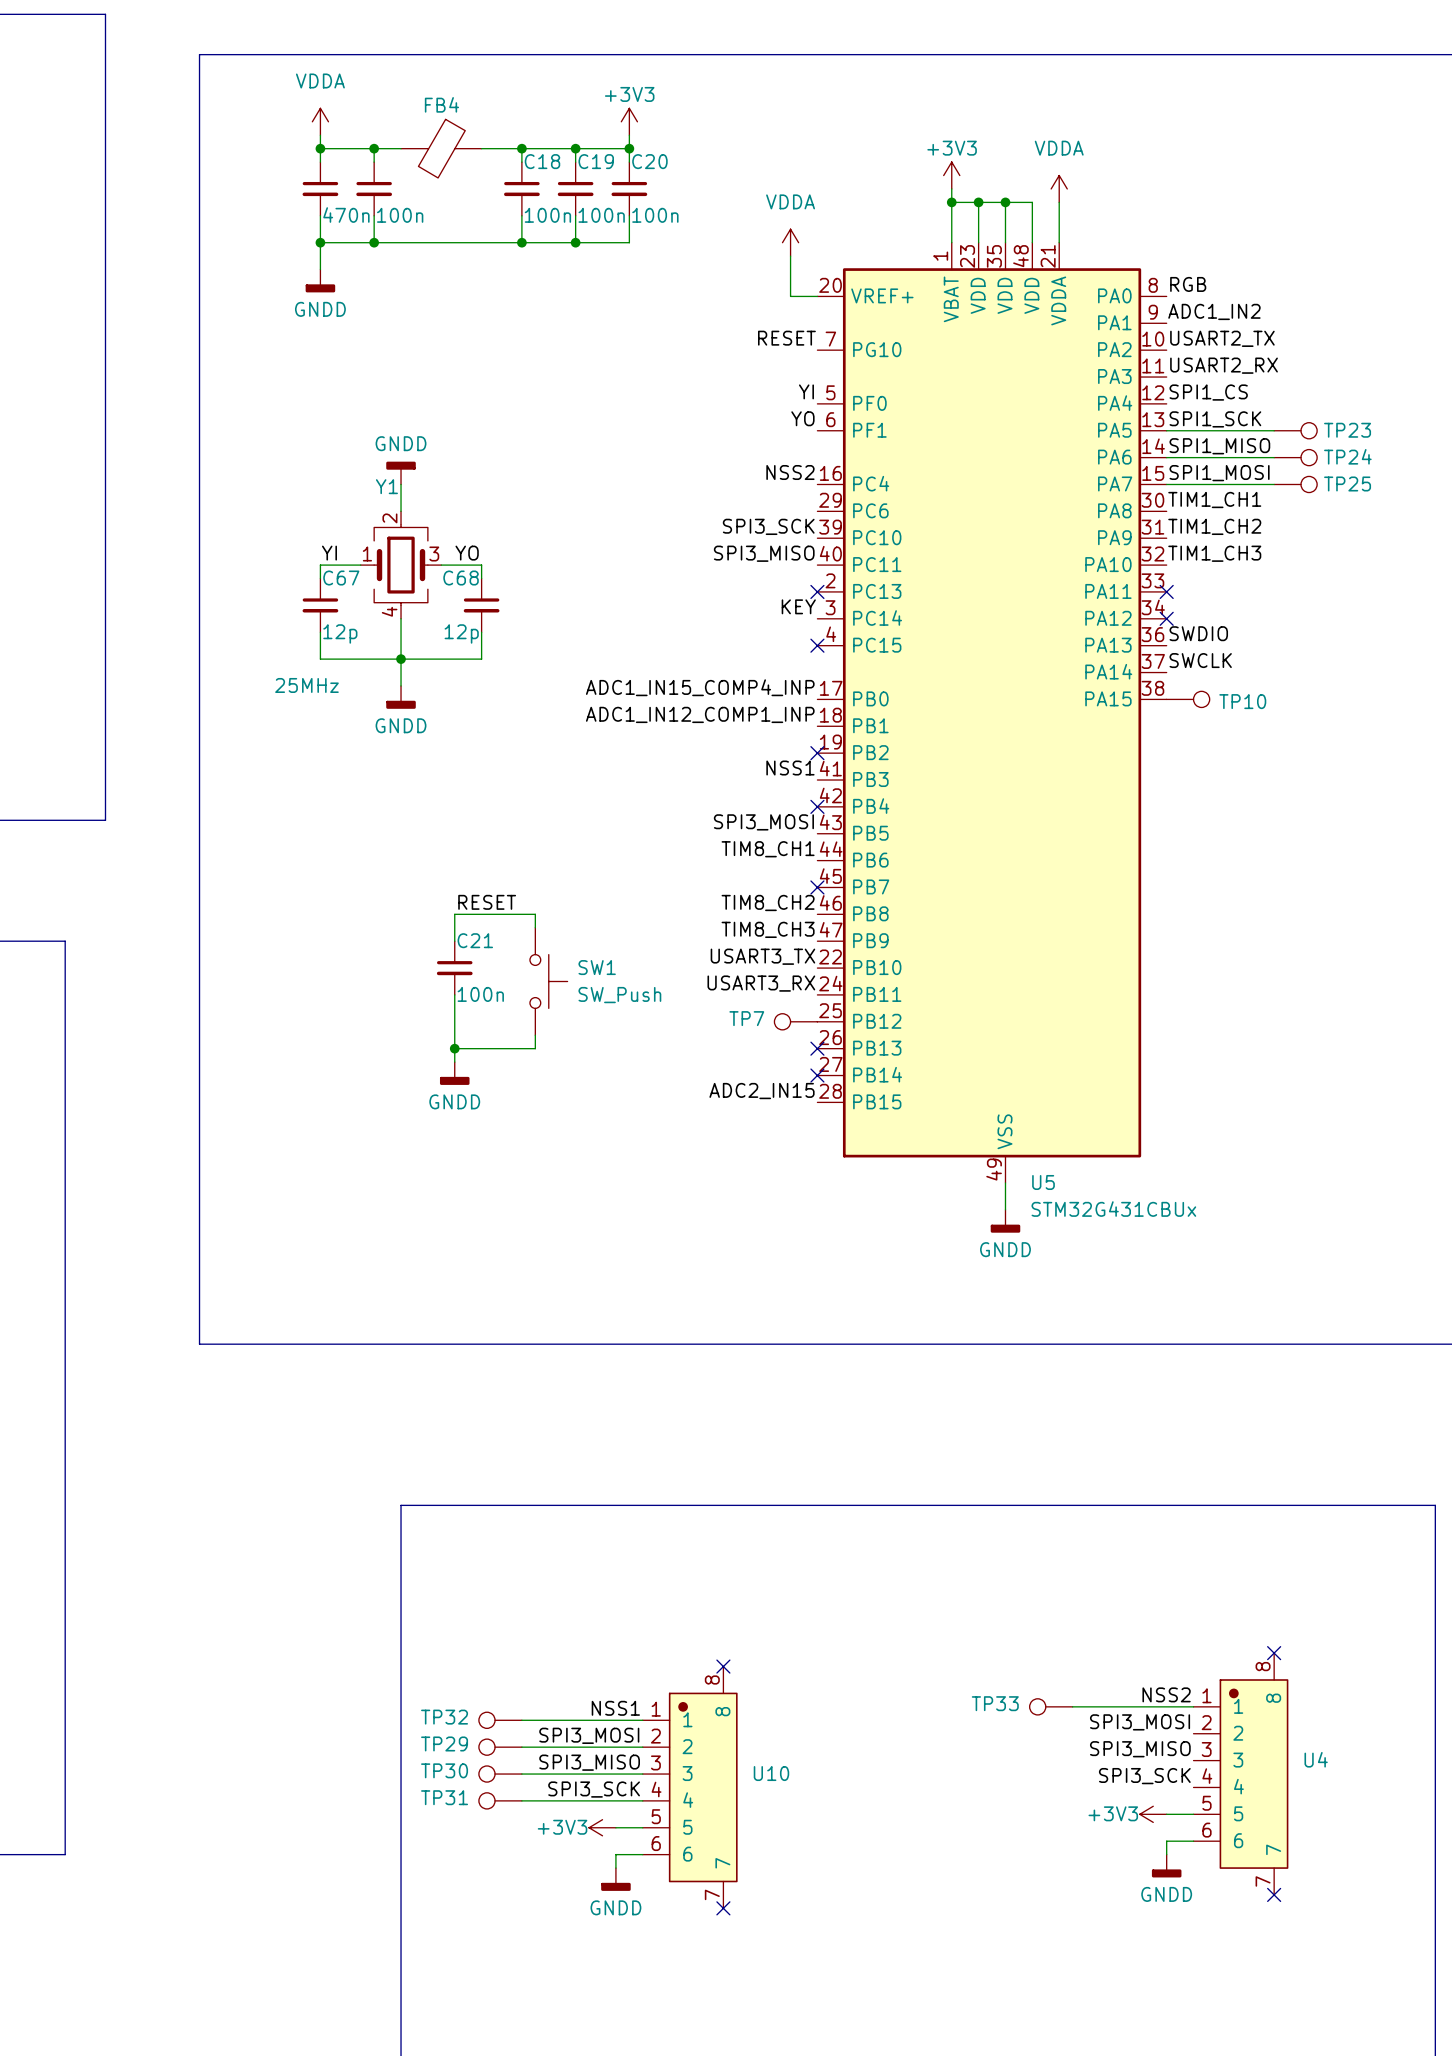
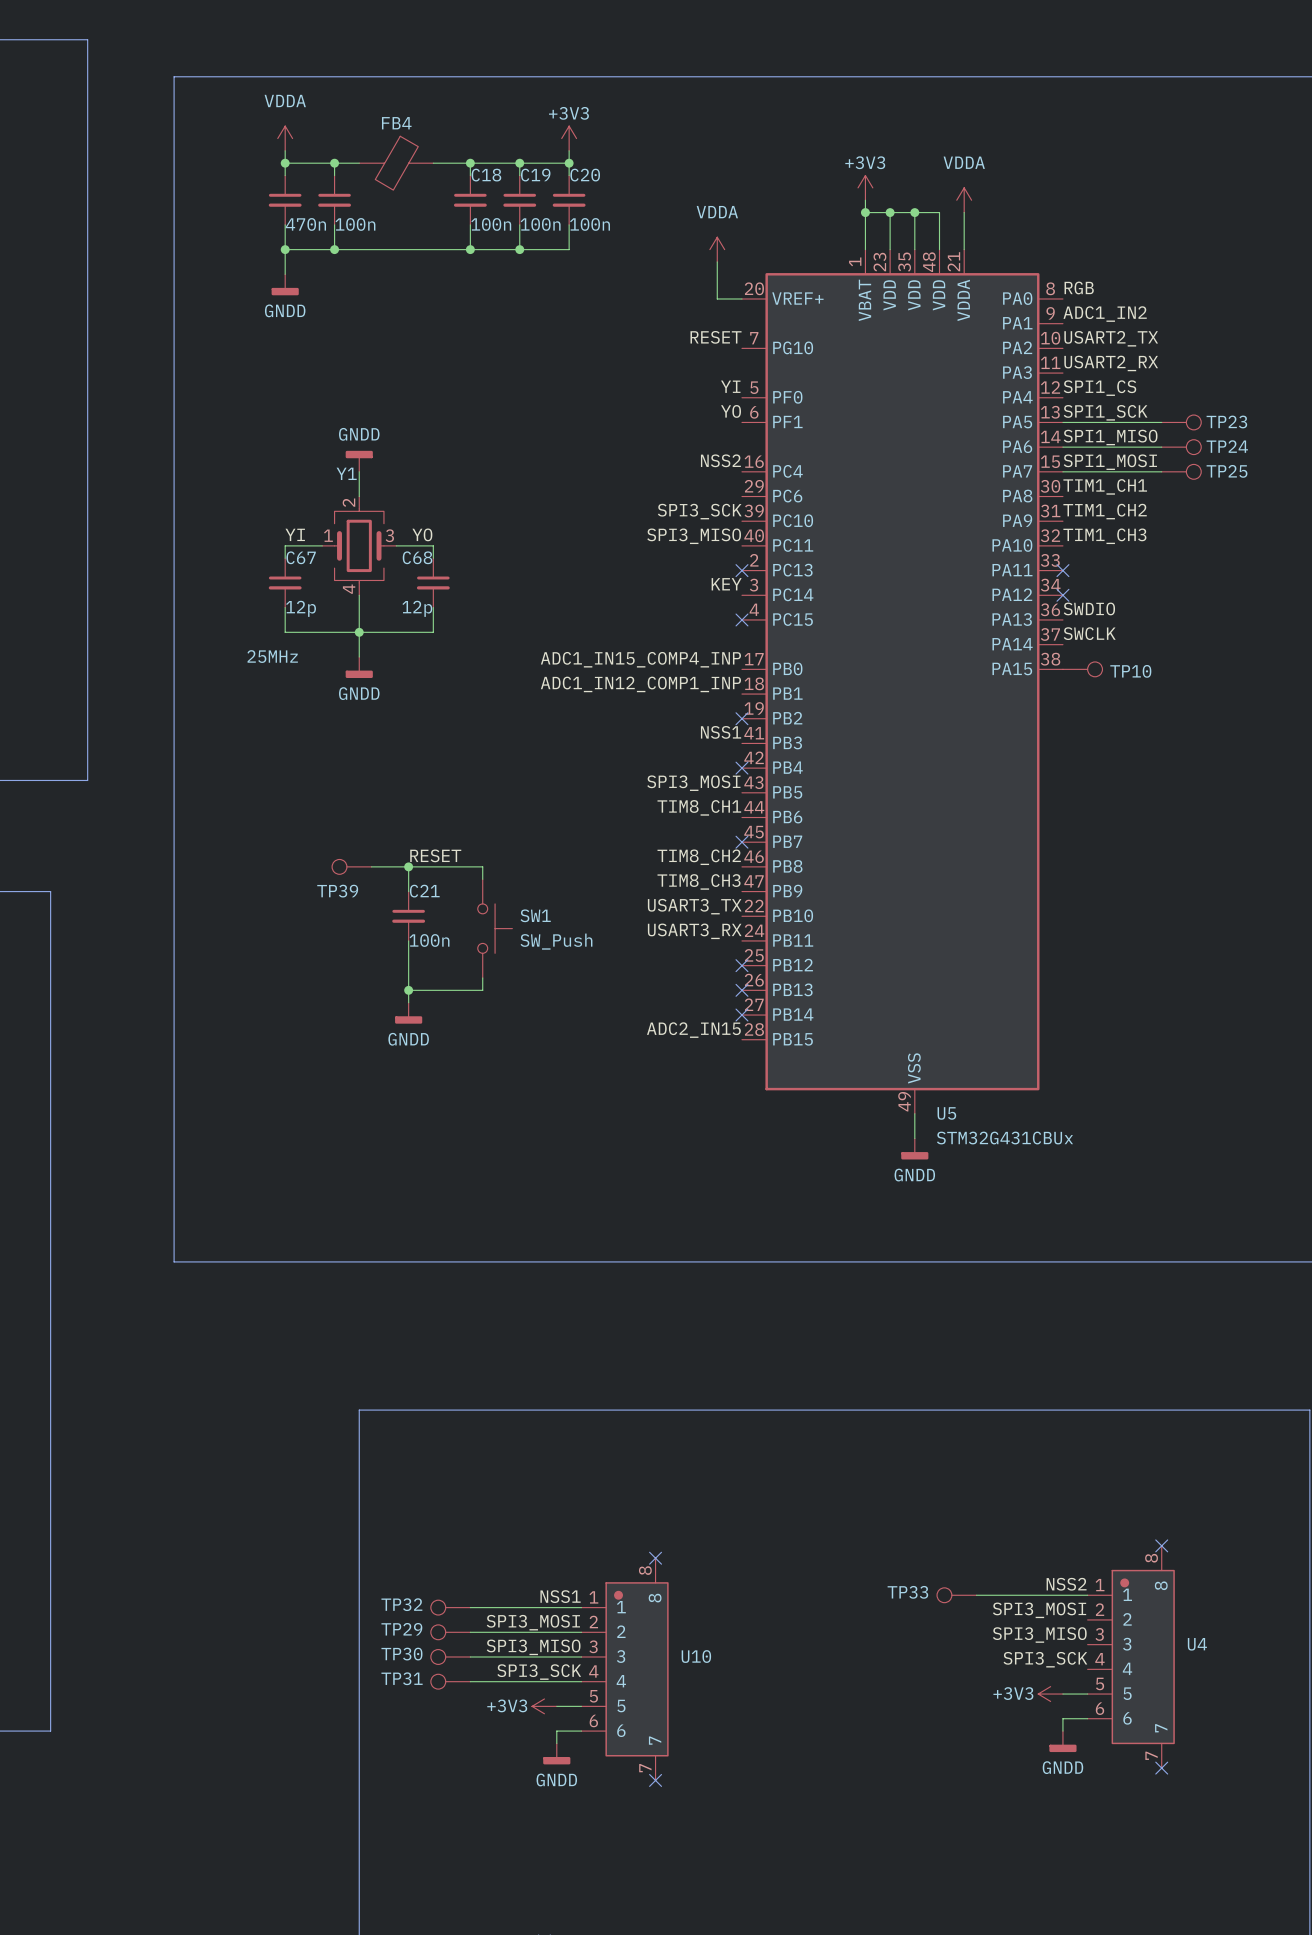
TP39: none -> (351, 866)
wire: none -> (371, 866) (408, 866)
junction: none -> (408, 866)
TP7: (795, 1021) -> none
no-connect mark: none -> (741, 965)

